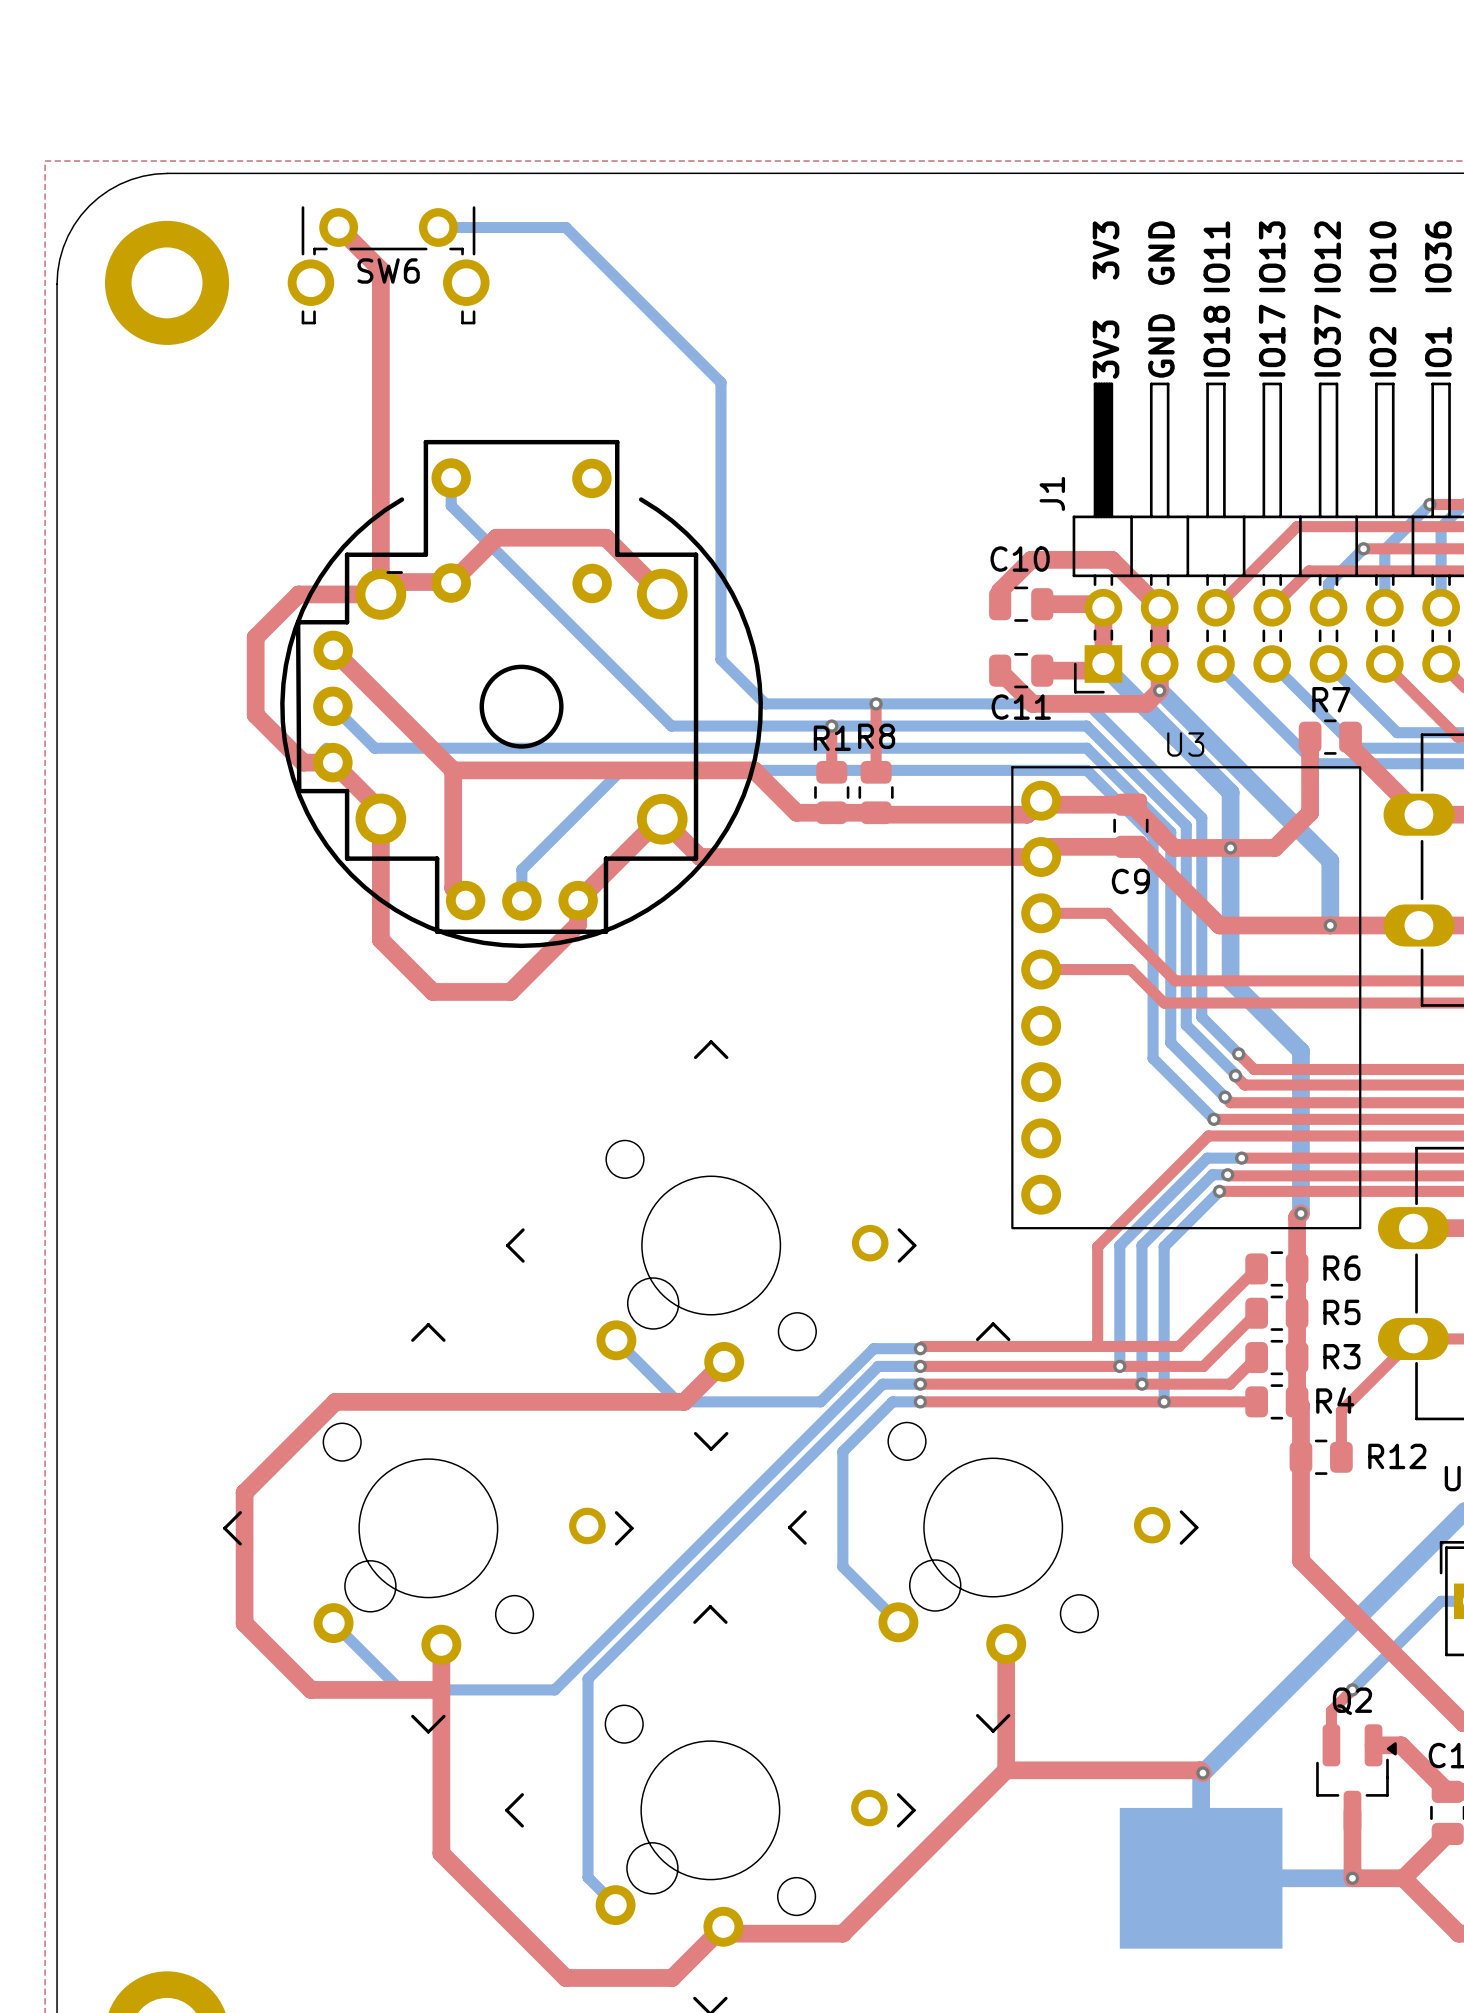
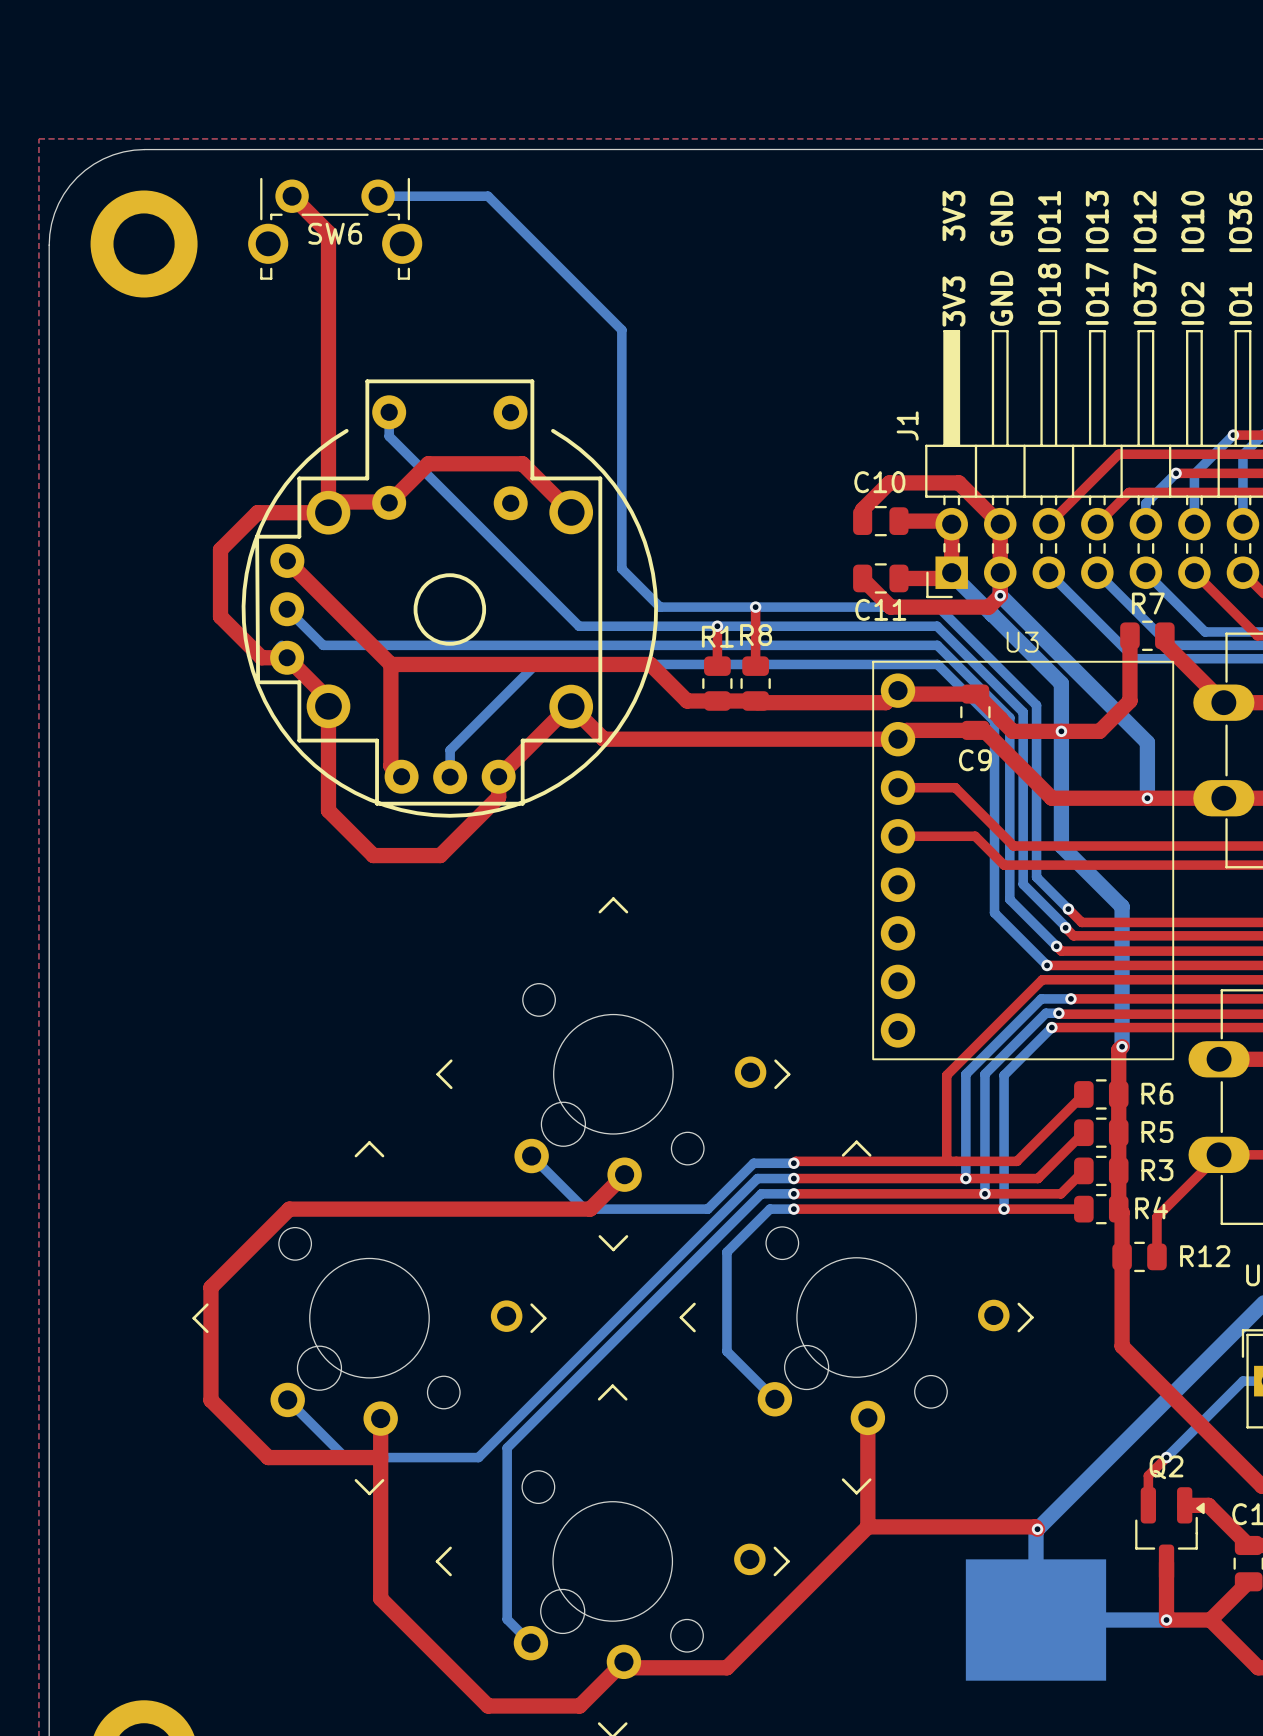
part footprint: [280, 439, 763, 949] -> [241, 379, 659, 818]

